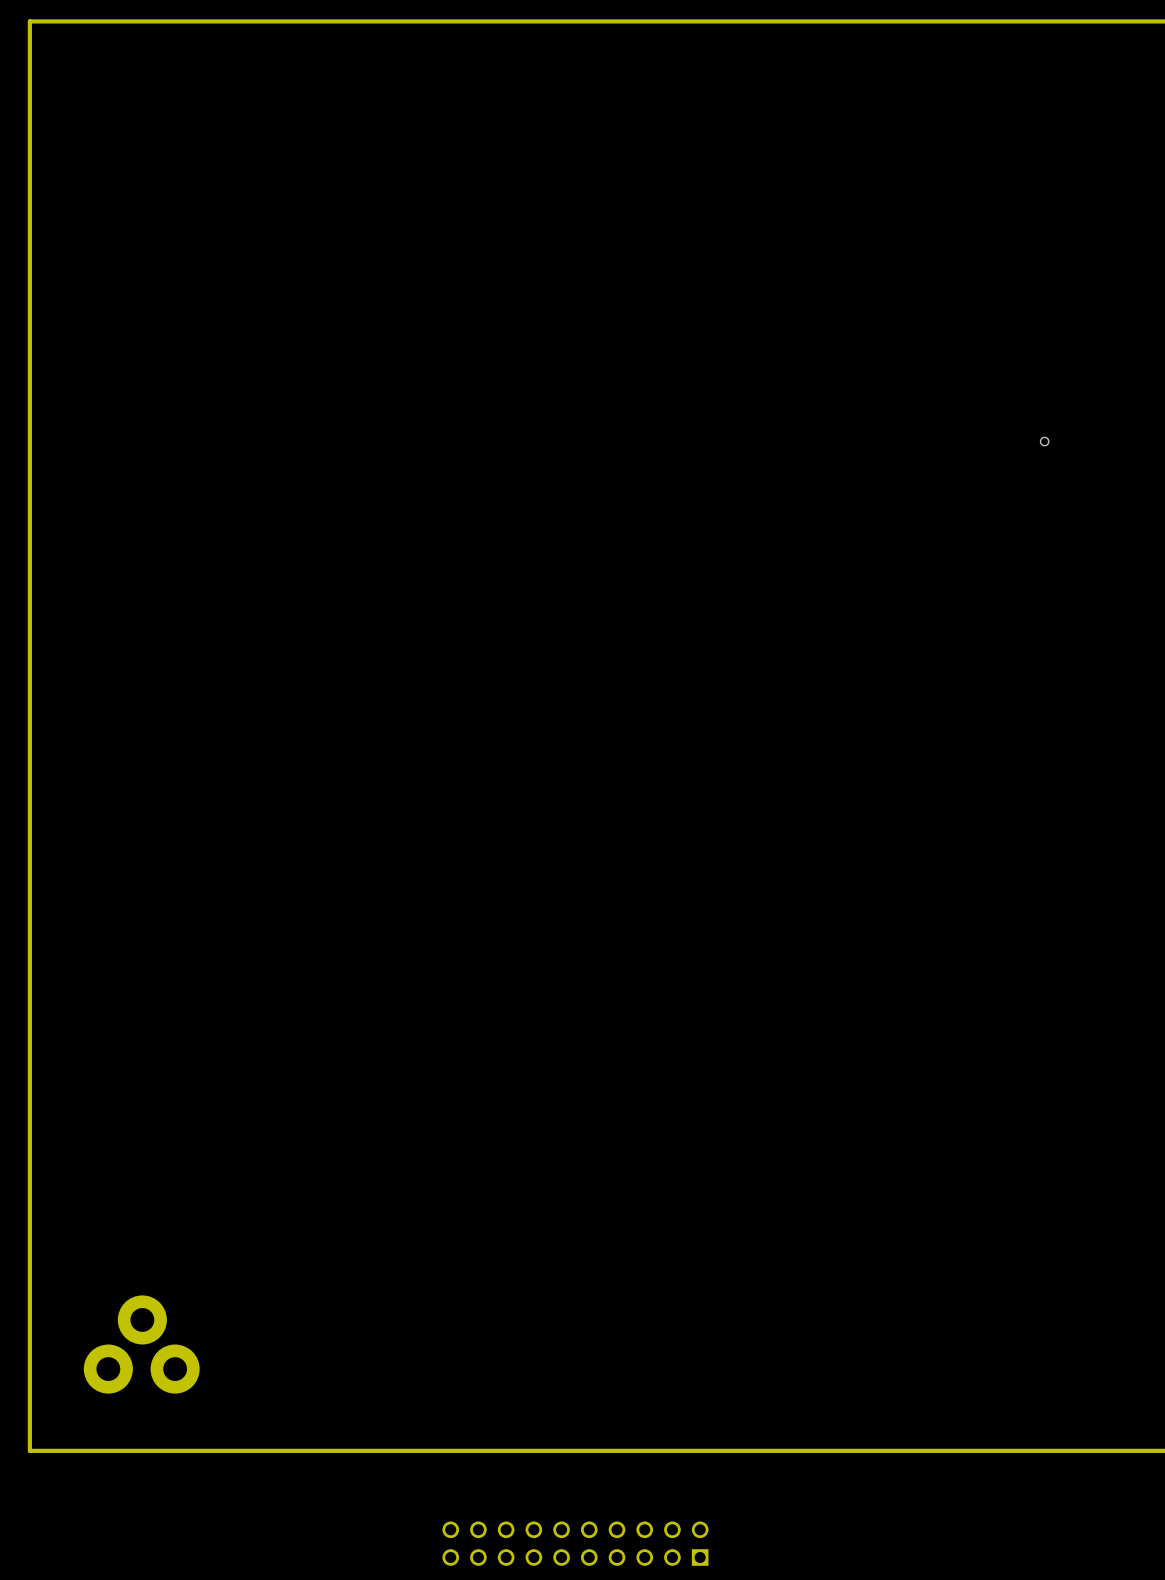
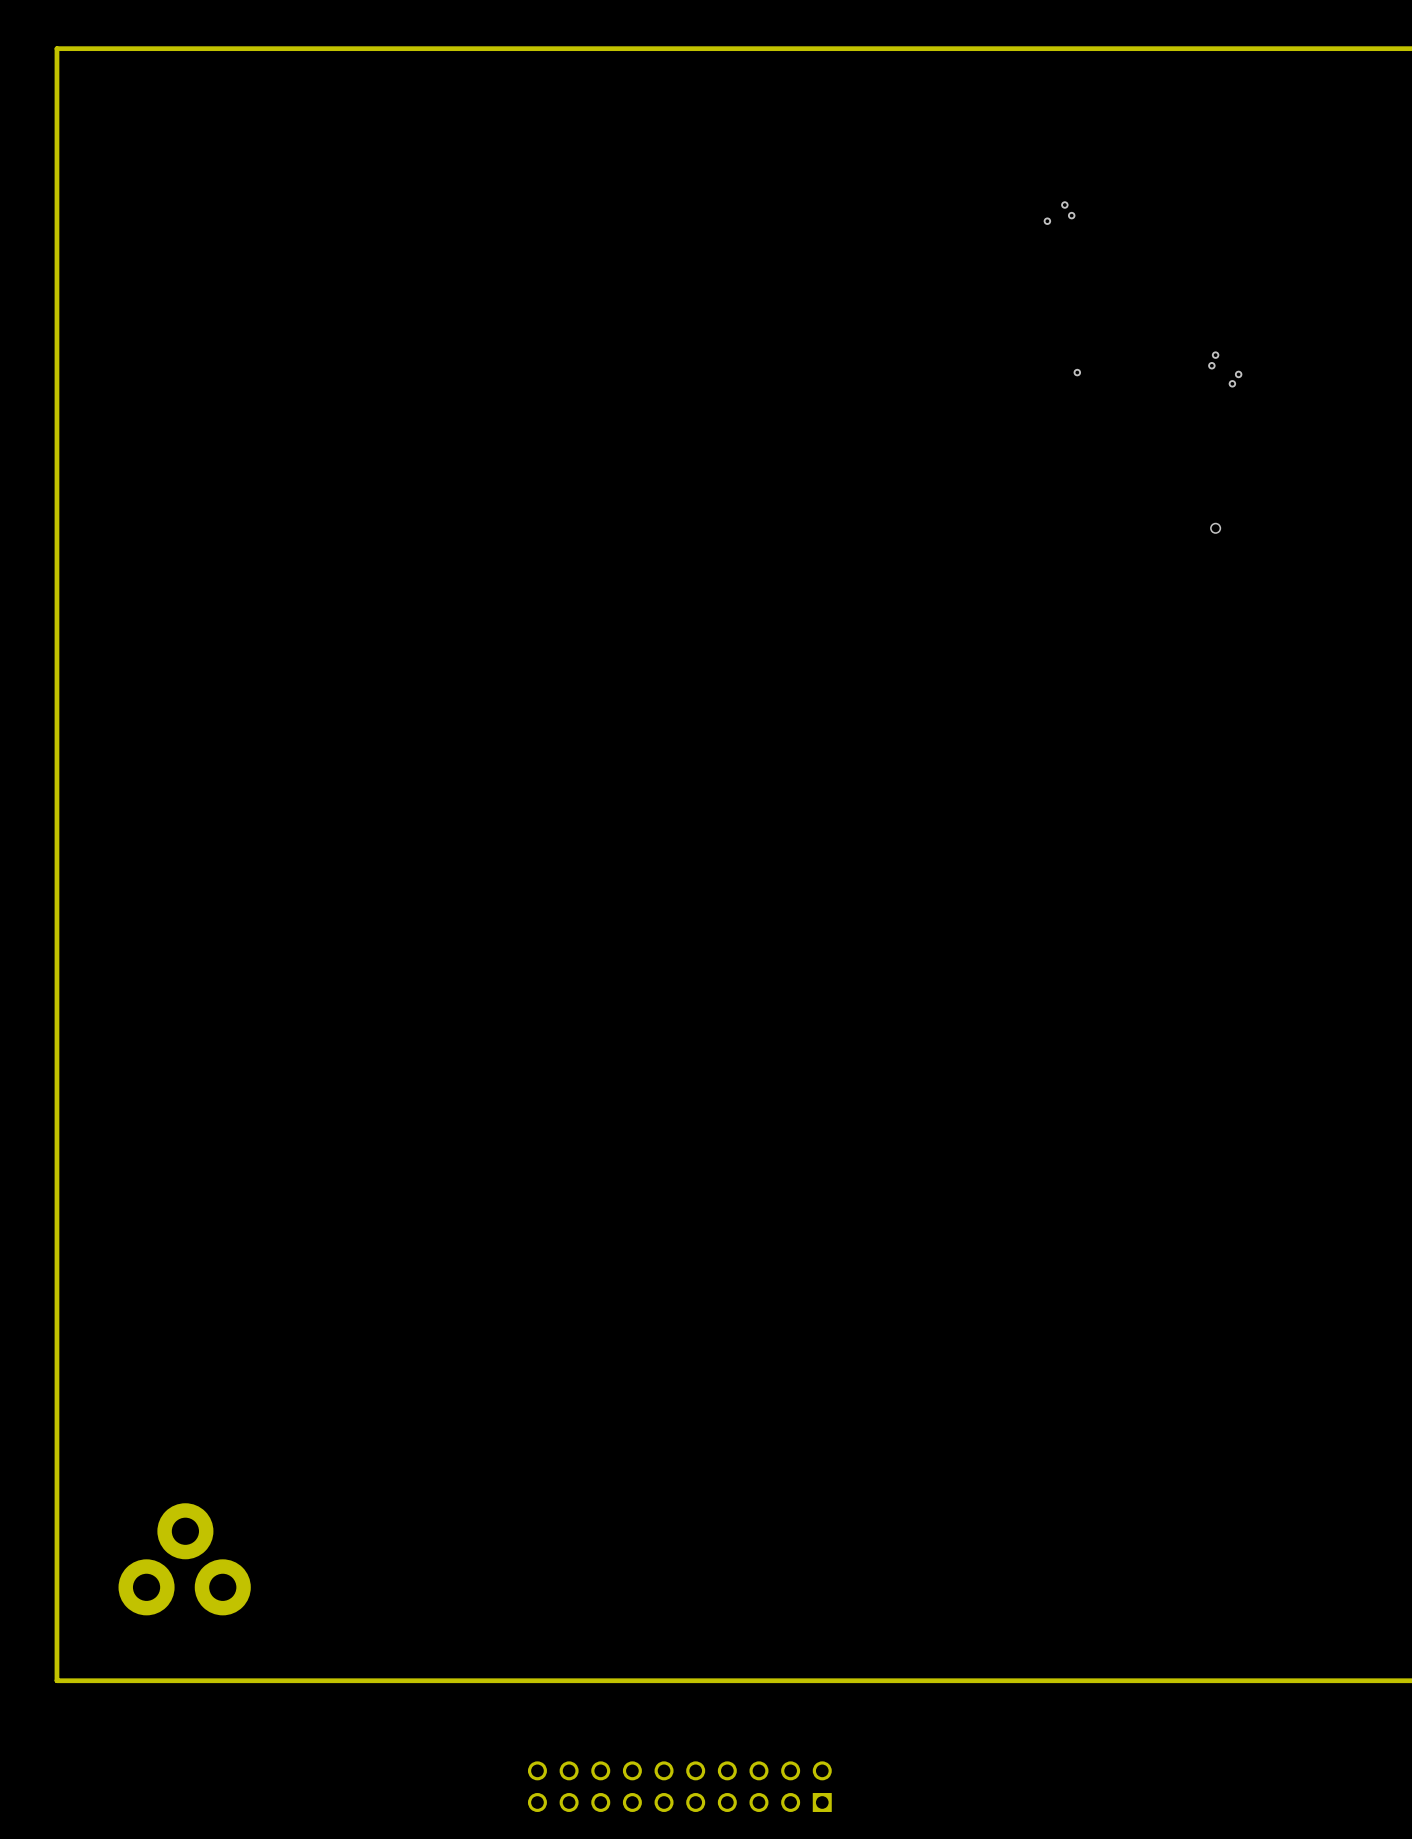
via: none -> (1064, 205)
via: none -> (1071, 215)
via: none -> (1047, 221)
via: none -> (1215, 355)
via: none -> (1211, 365)
via: none -> (1077, 372)
via: none -> (1238, 374)
via: none -> (1232, 383)

